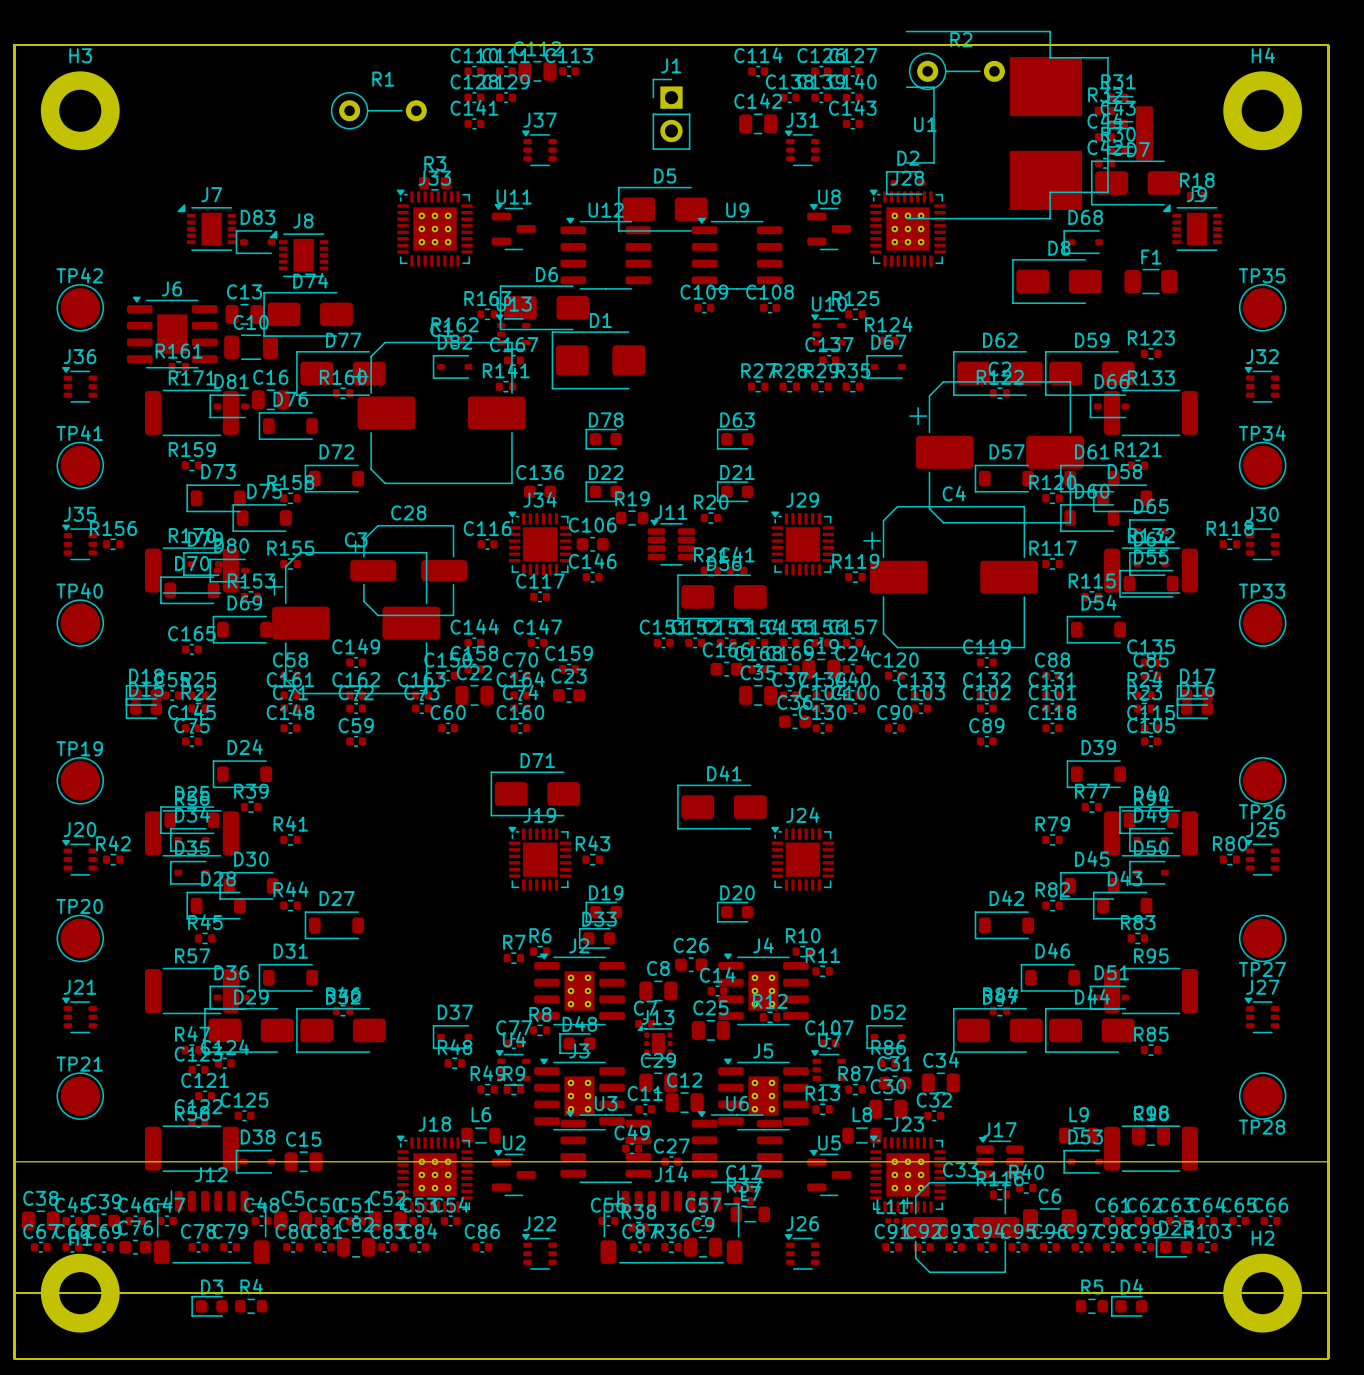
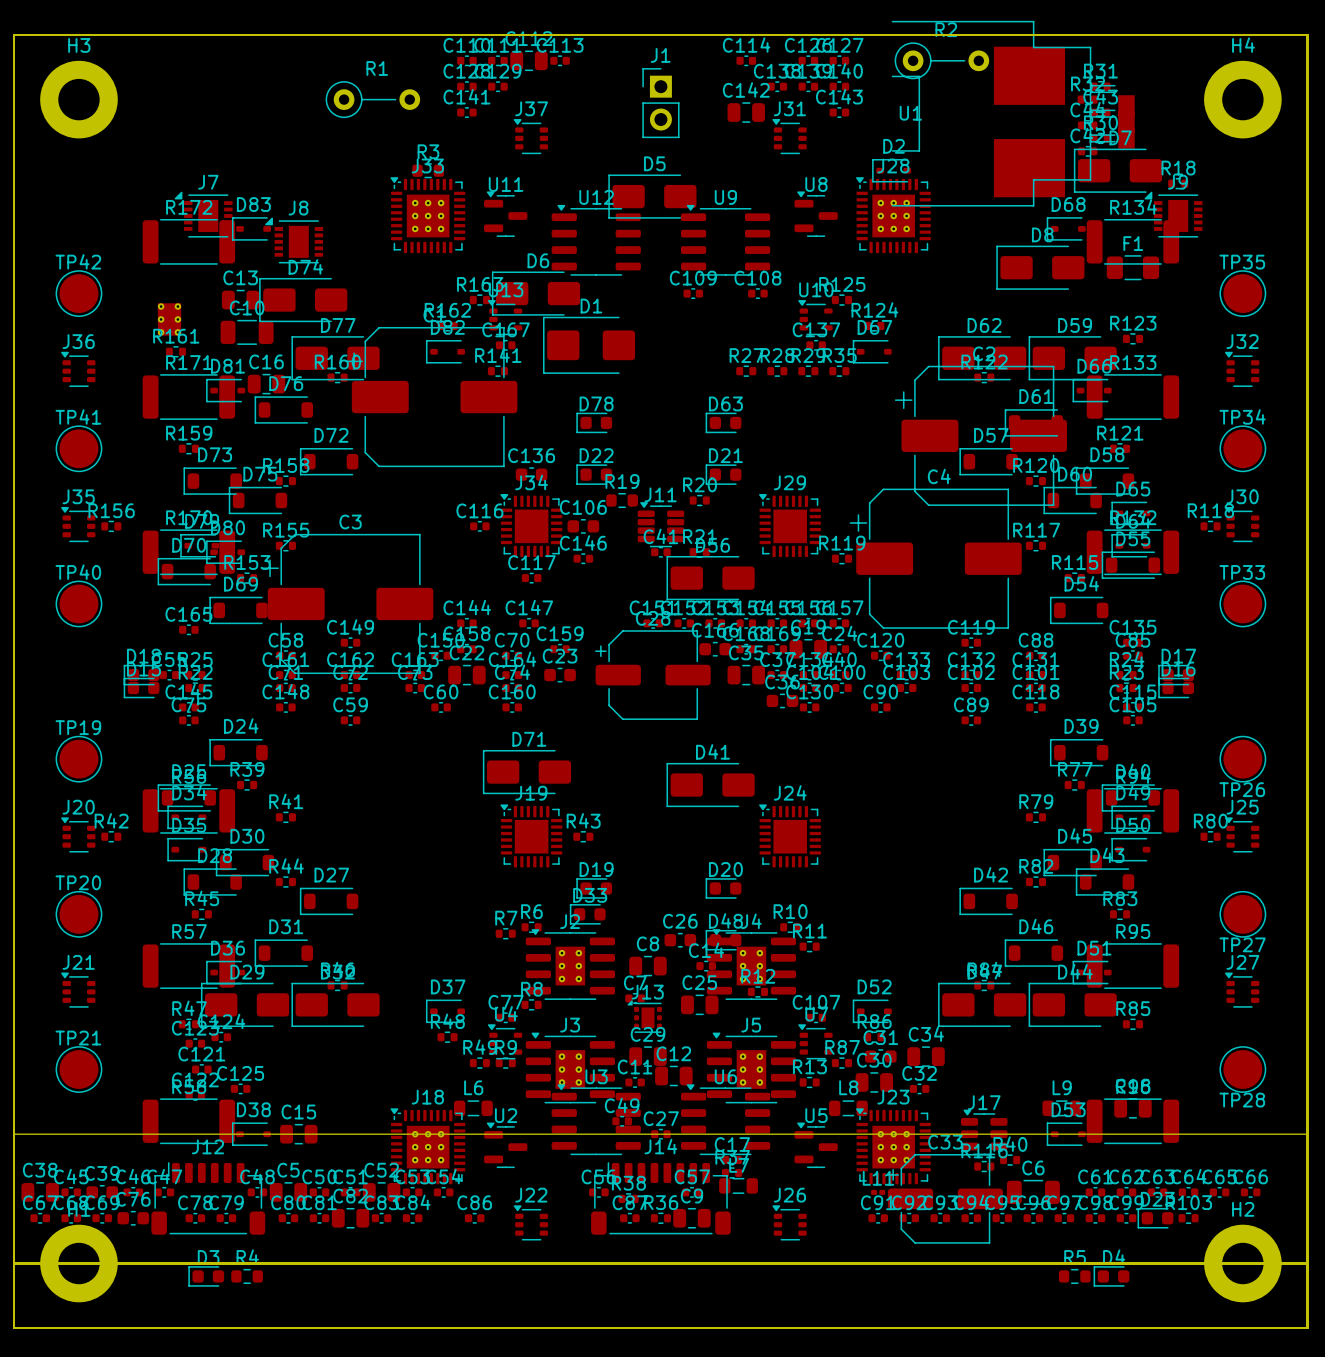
R172: none -> (188, 241)
R134: none -> (1132, 241)
J6: (172, 332) -> none
part: none -> (169, 319)
D61 position: (1089, 478) -> (1033, 422)
C28 position: (408, 570) -> (652, 675)
C41 position: (737, 570) -> (660, 552)
D48 position: (577, 1043) -> (723, 940)

